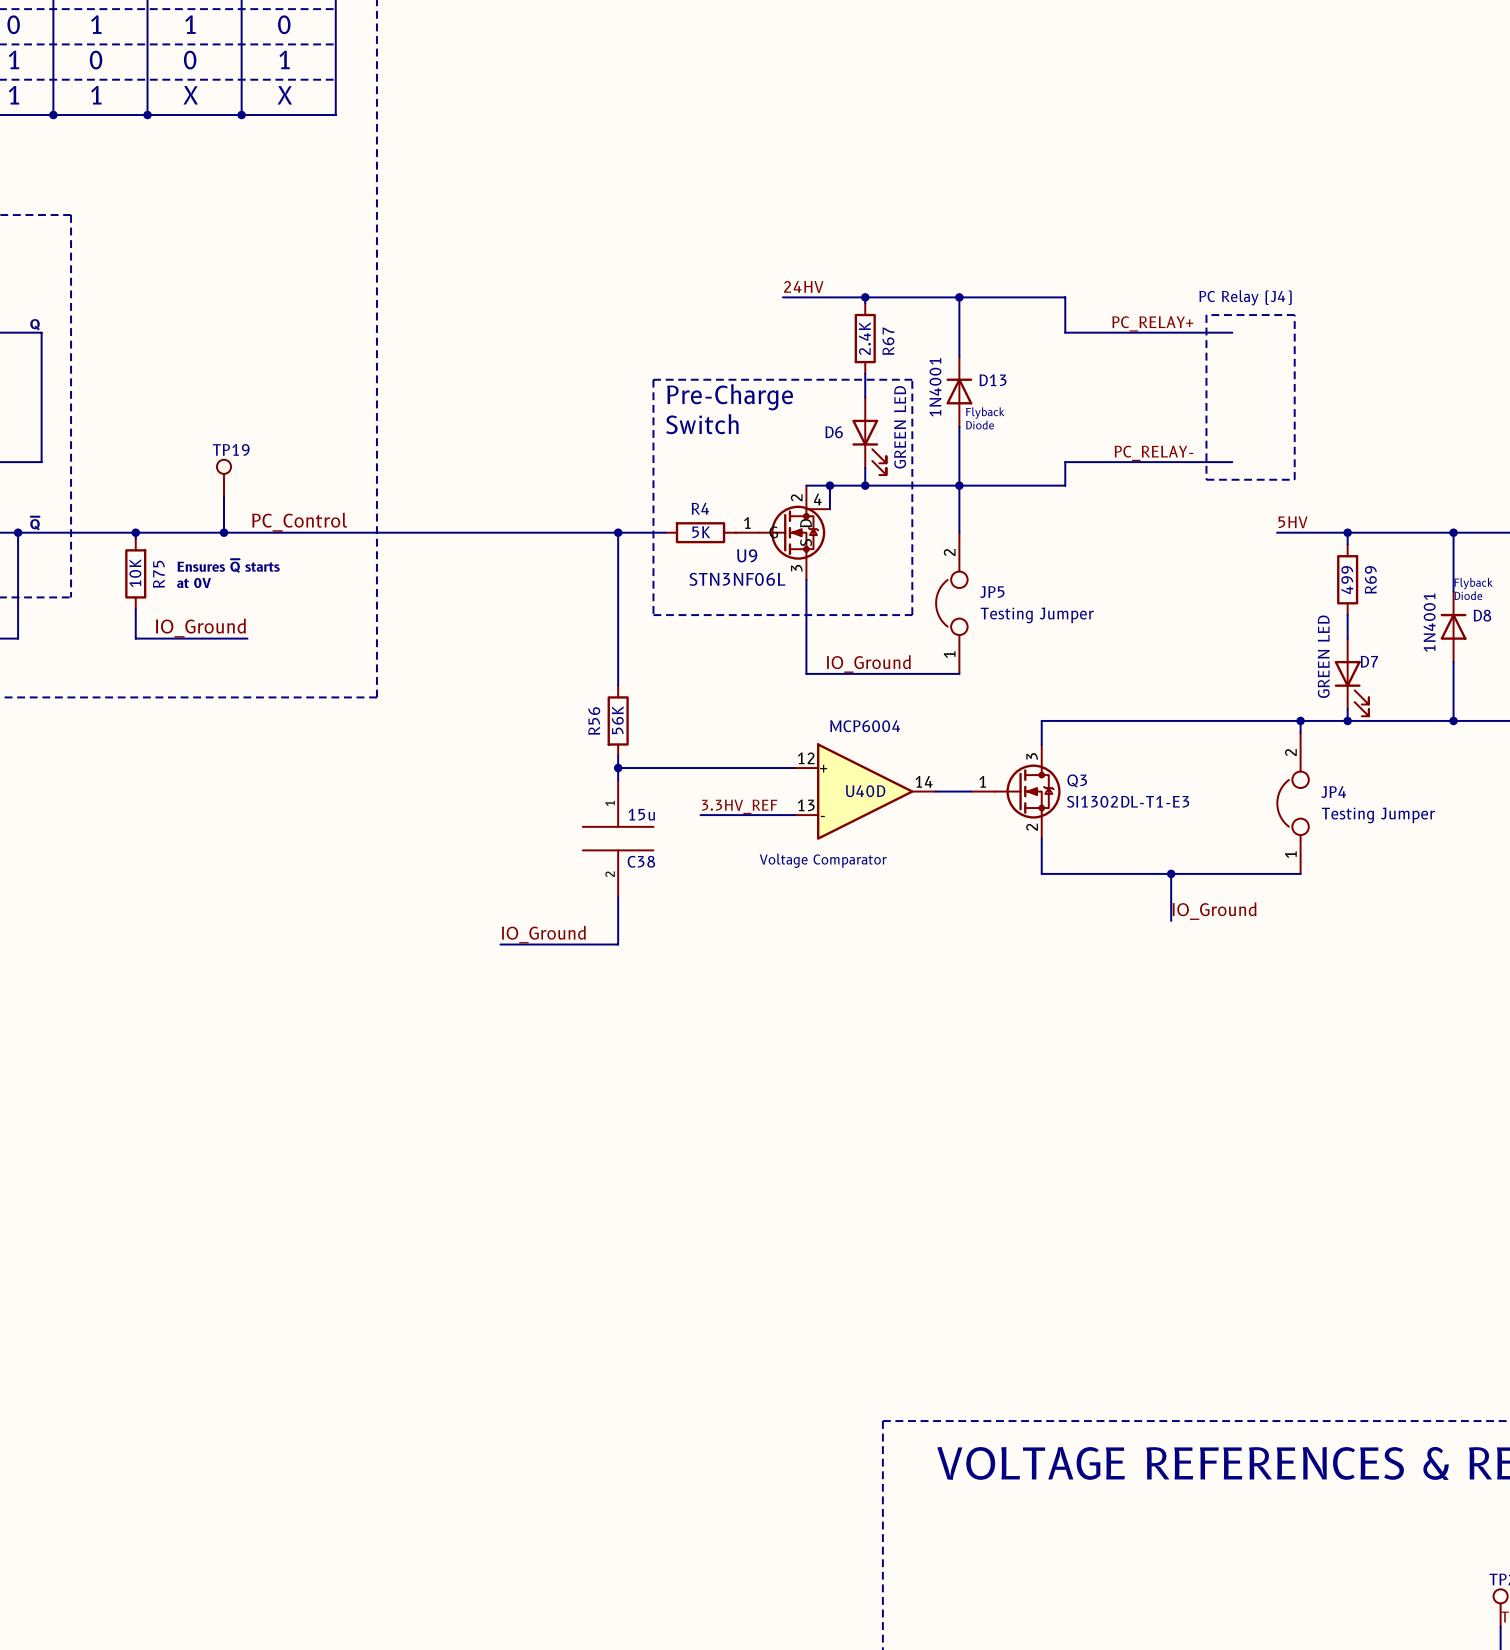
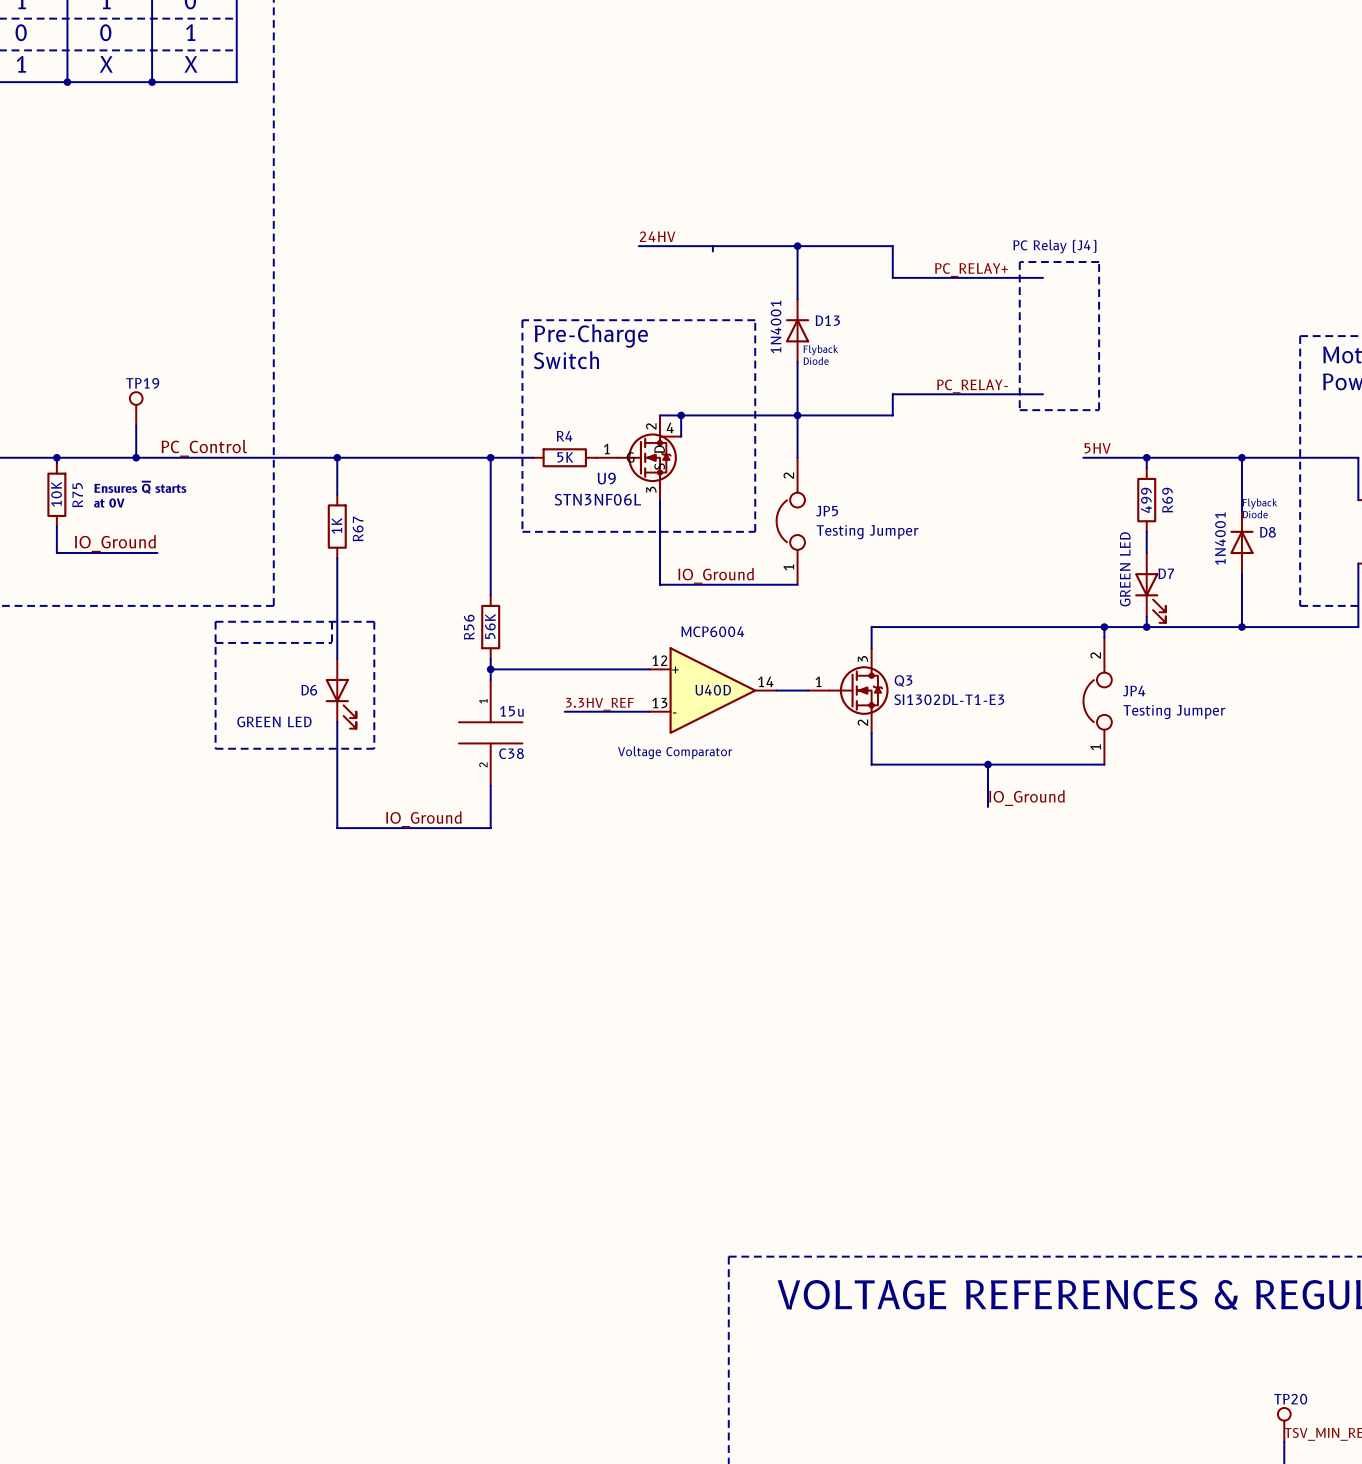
junction: (865, 297) -> none
R67 value: 2.4K (864, 338) -> 1K (336, 525)
R67 position: (865, 338) -> (337, 526)
wire: (865, 373) (865, 397) -> none
D6 value rotation: 0° (900, 427) -> 90° clockwise (274, 721)
D6 position: (869, 436) -> (340, 693)
wire: (865, 467) (865, 485) -> none
junction: (865, 485) -> none
wire: none -> (337, 457) (337, 494)
junction: none -> (337, 457)
wire: none -> (337, 558) (337, 658)
line: none -> (215, 621) (374, 621) (374, 748) (215, 748) (215, 621)
line: none -> (331, 621) (331, 642) (215, 642)
wire: none -> (337, 722) (337, 828) (384, 828)

